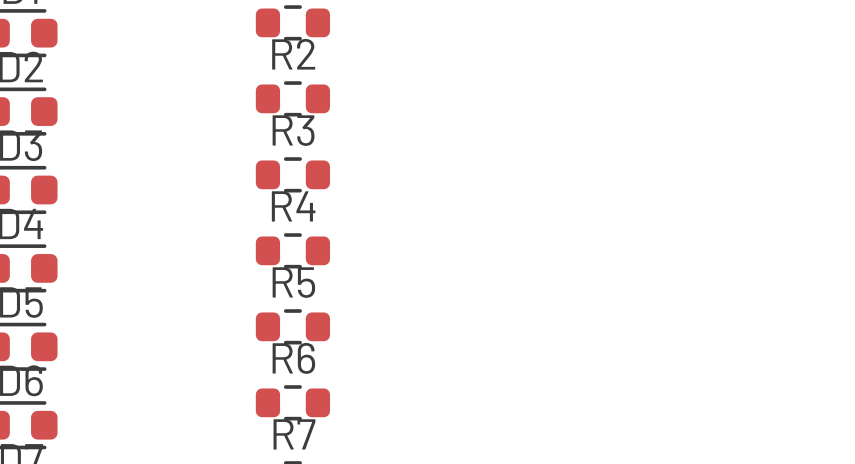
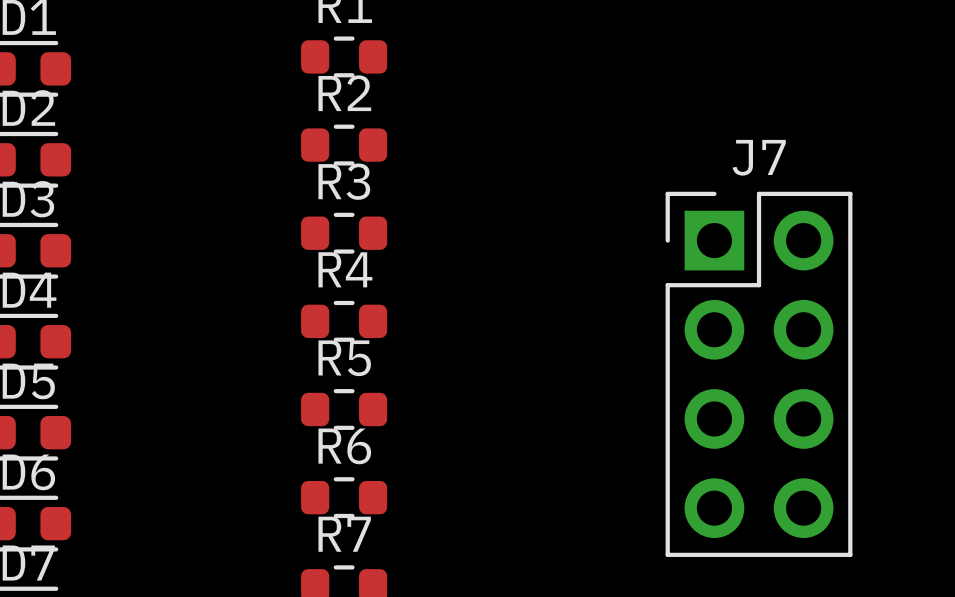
J7: none -> (759, 374)

